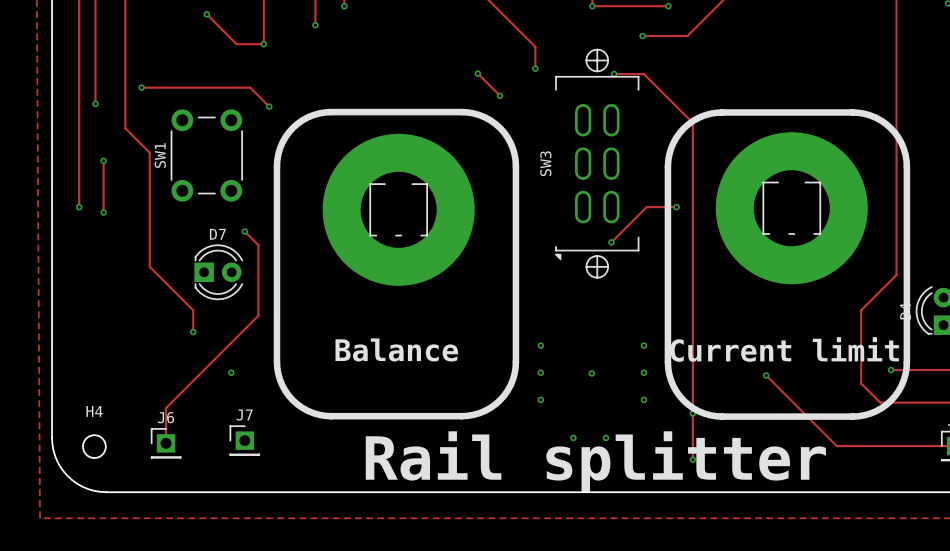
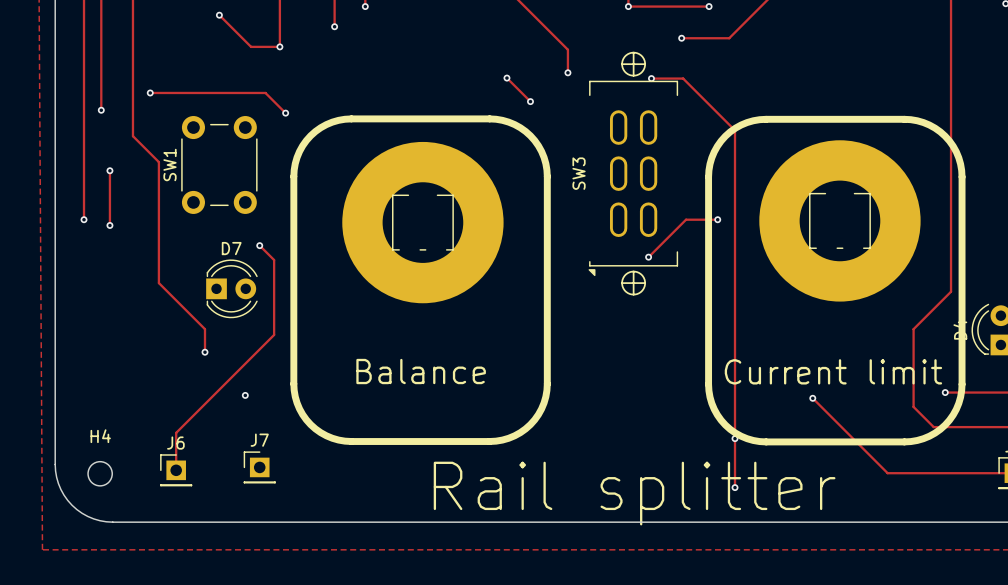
via: (540, 345) -> none
via: (643, 345) -> none
via: (540, 372) -> none
via: (643, 372) -> none
via: (591, 373) -> none
via: (540, 399) -> none
via: (643, 399) -> none
via: (573, 437) -> none
via: (605, 437) -> none

